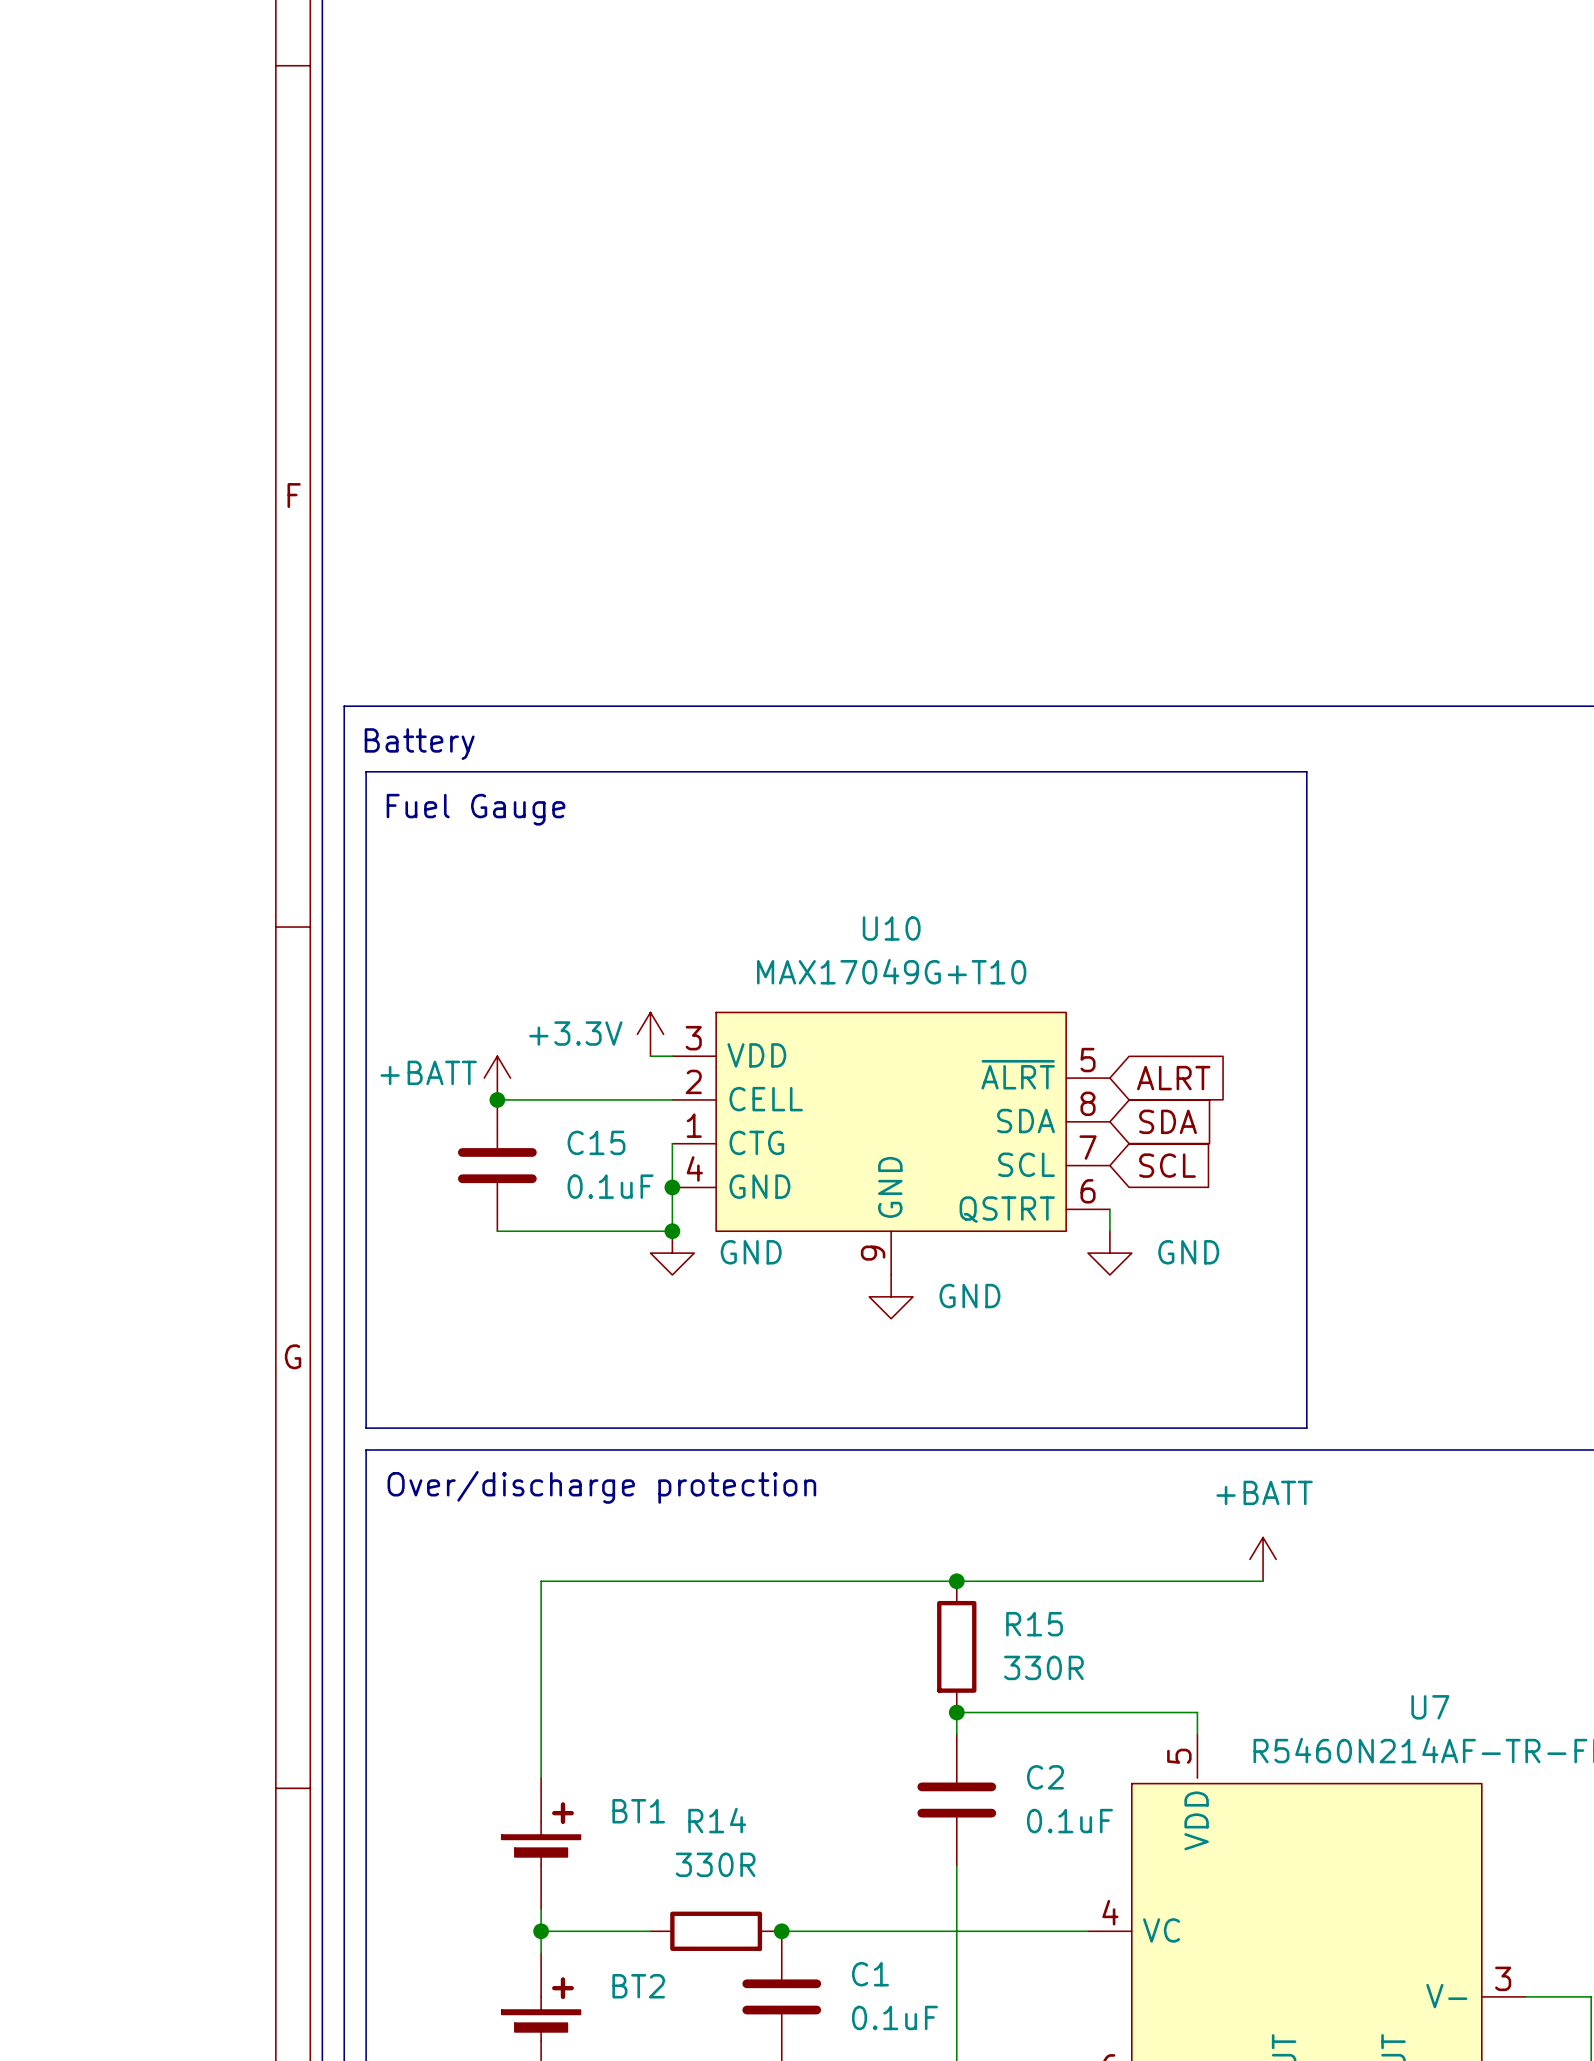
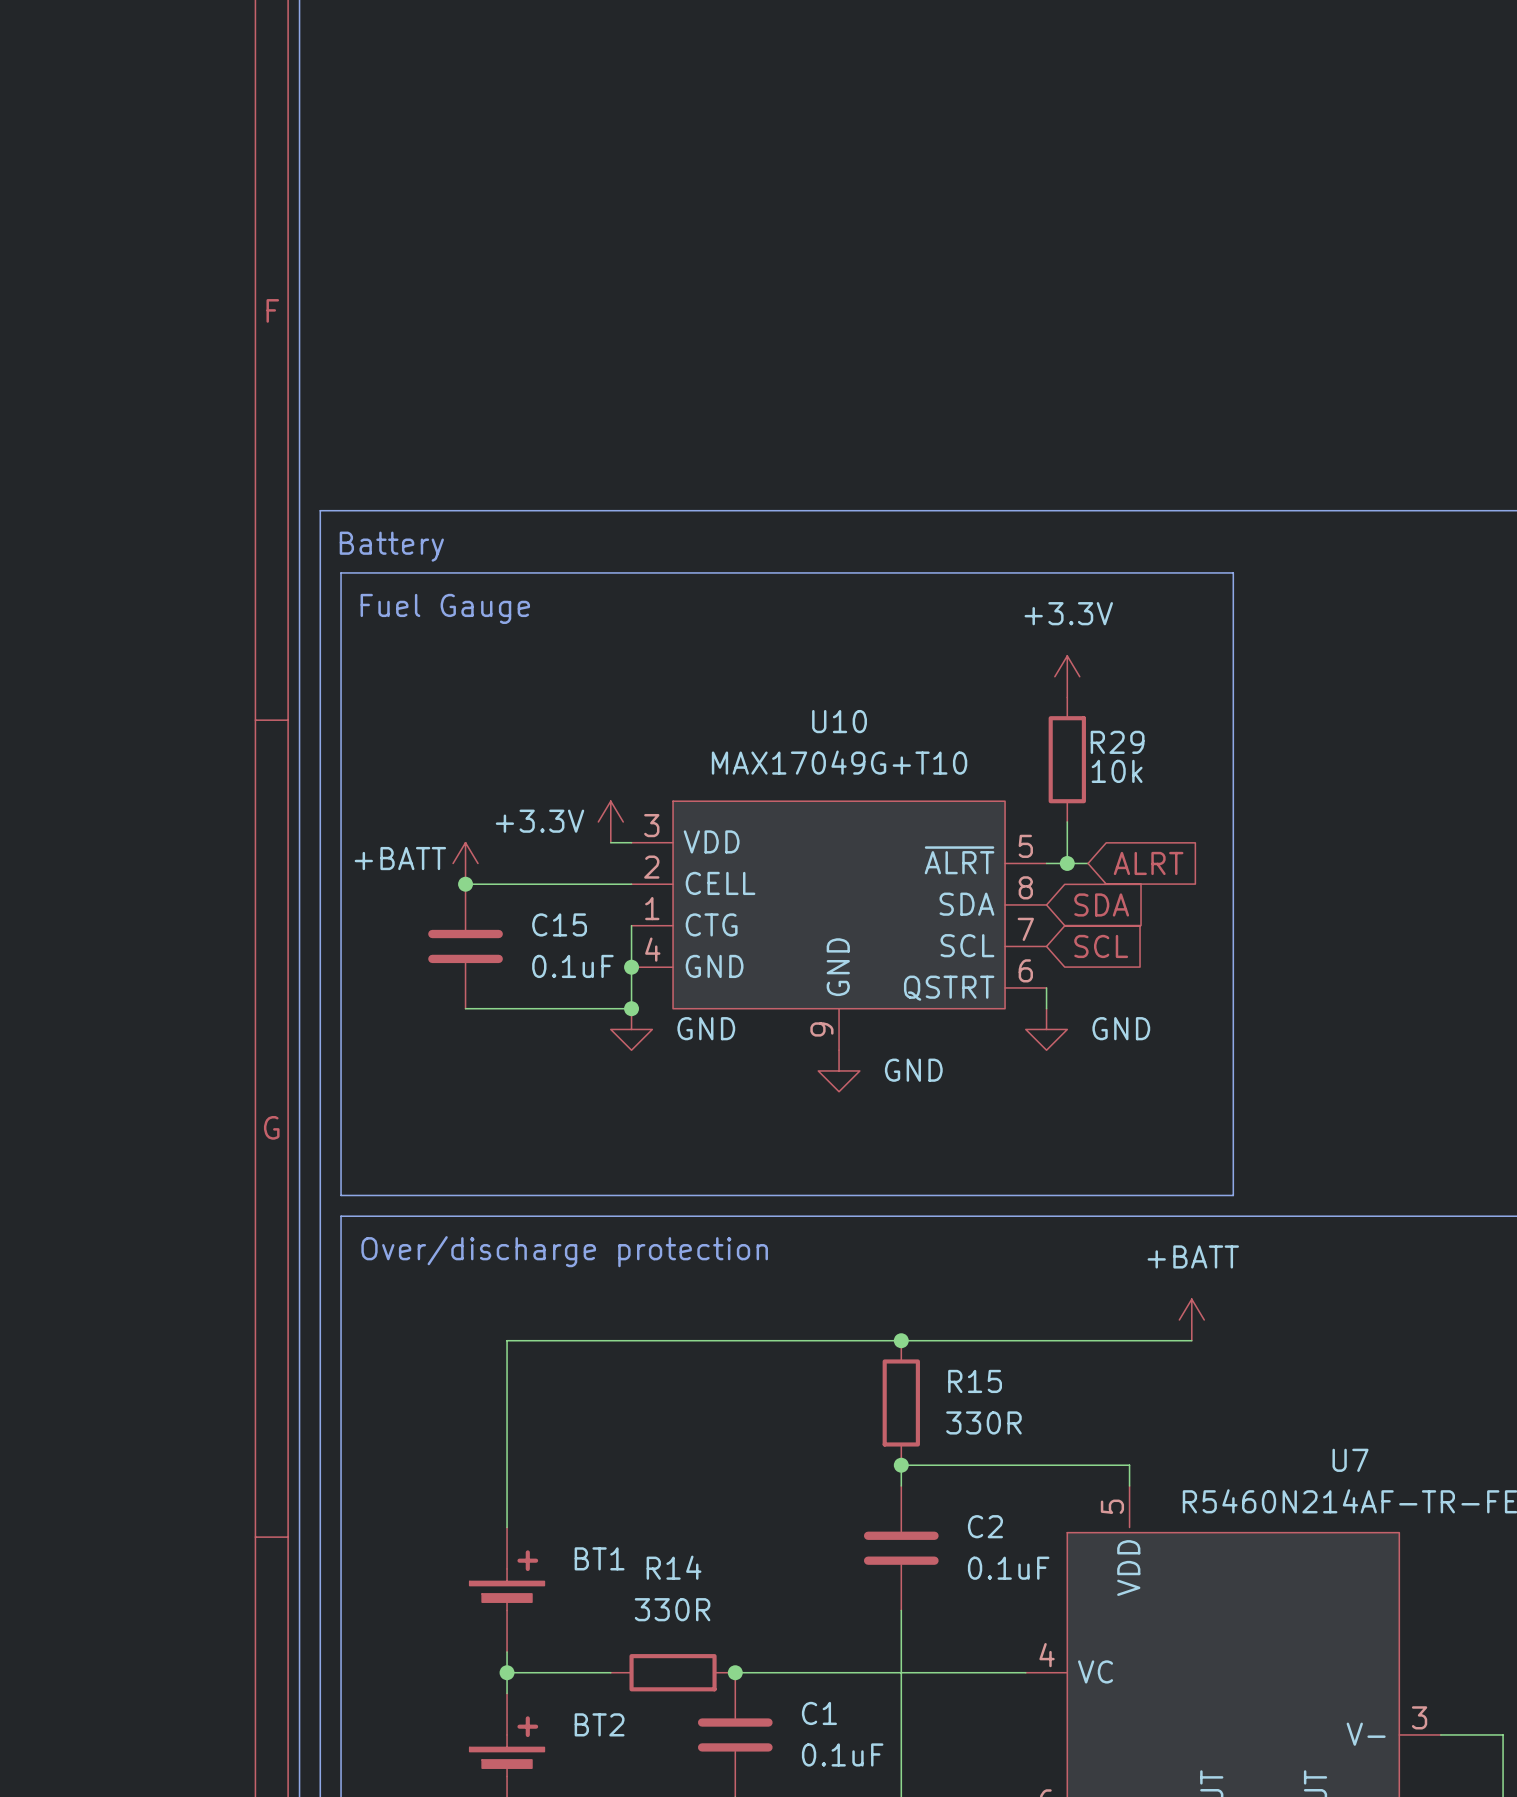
power symbol: none -> +3.3V (1067, 676)
R29: none -> 10k (1067, 759)
wire: none -> (1067, 821) (1067, 863)
wire: none -> (1046, 863) (1088, 863)
junction: none -> (1067, 863)
global label position: ALRT (1173, 1078) -> ALRT (1148, 863)

